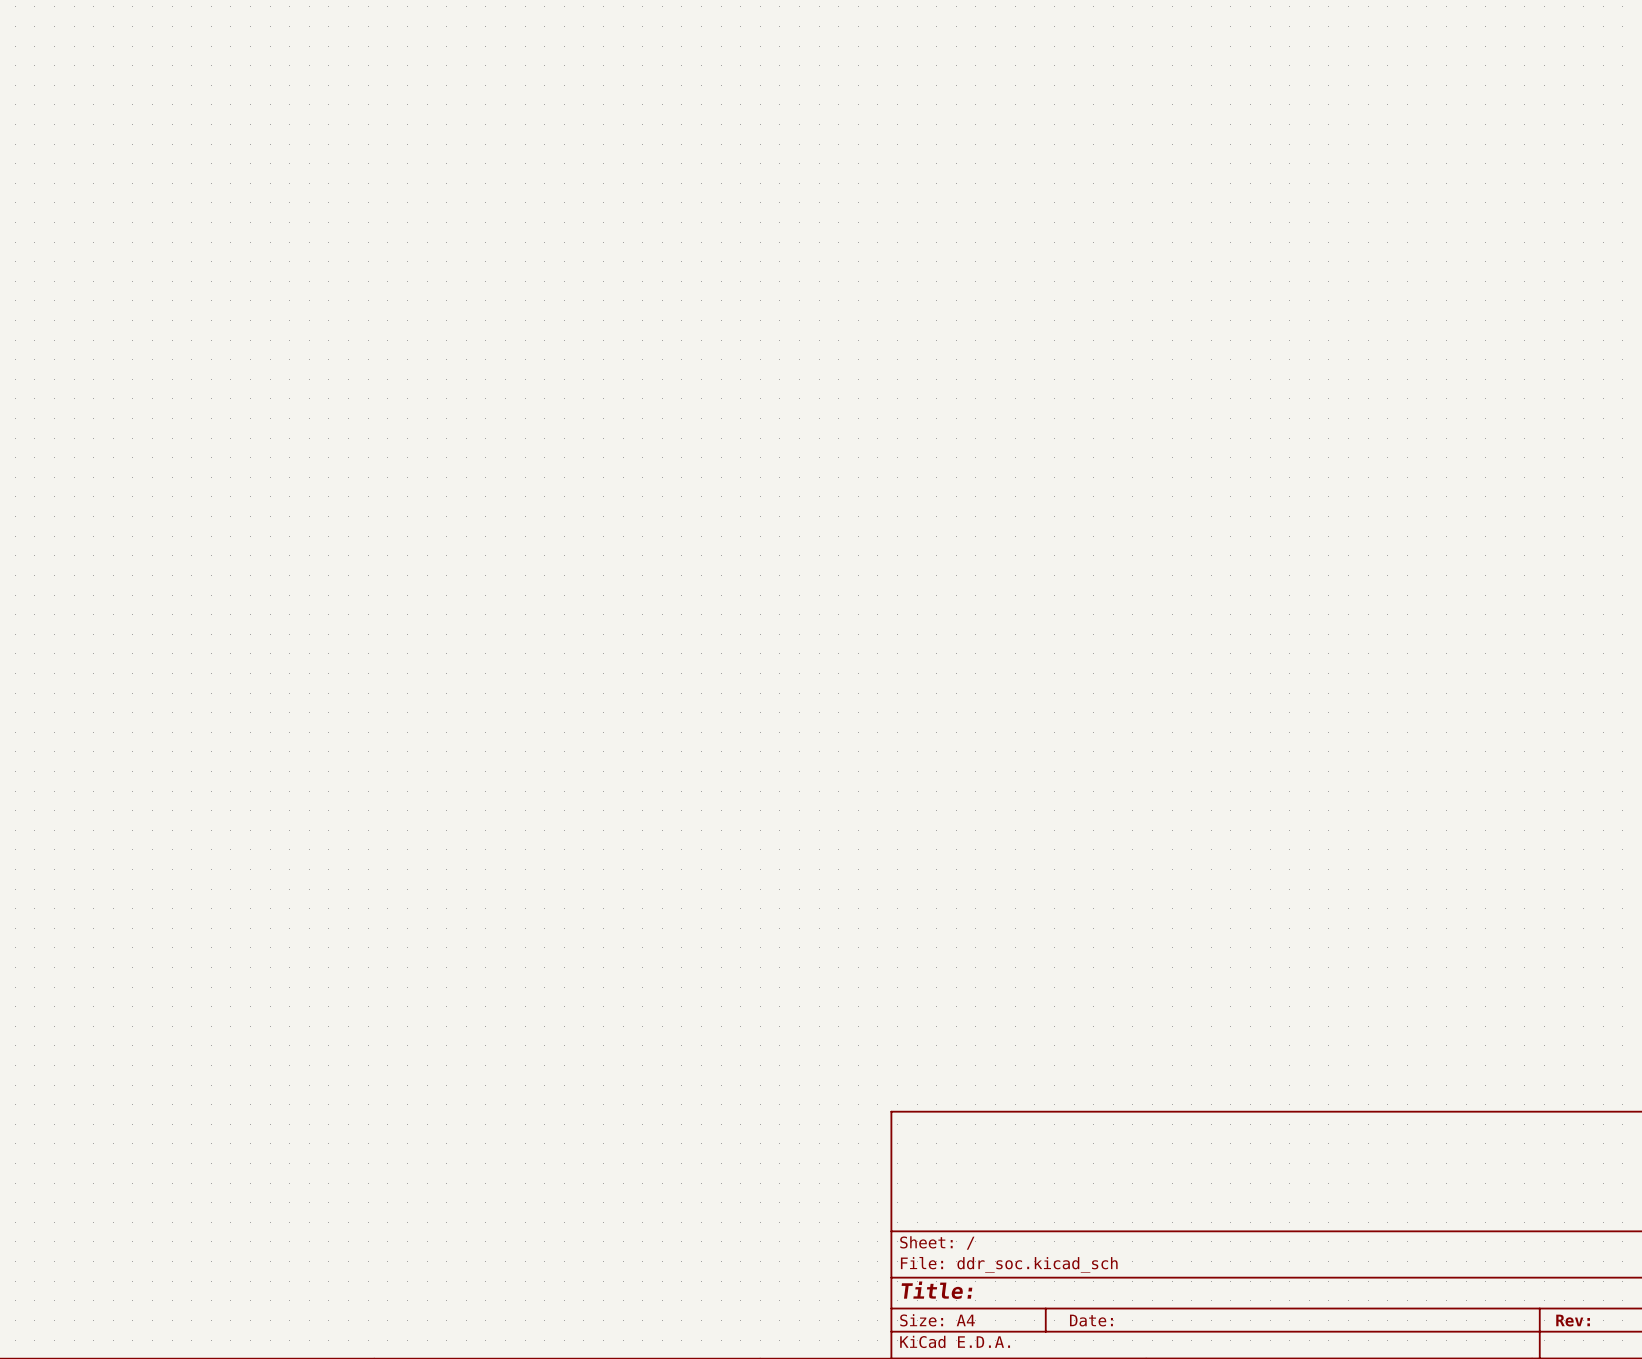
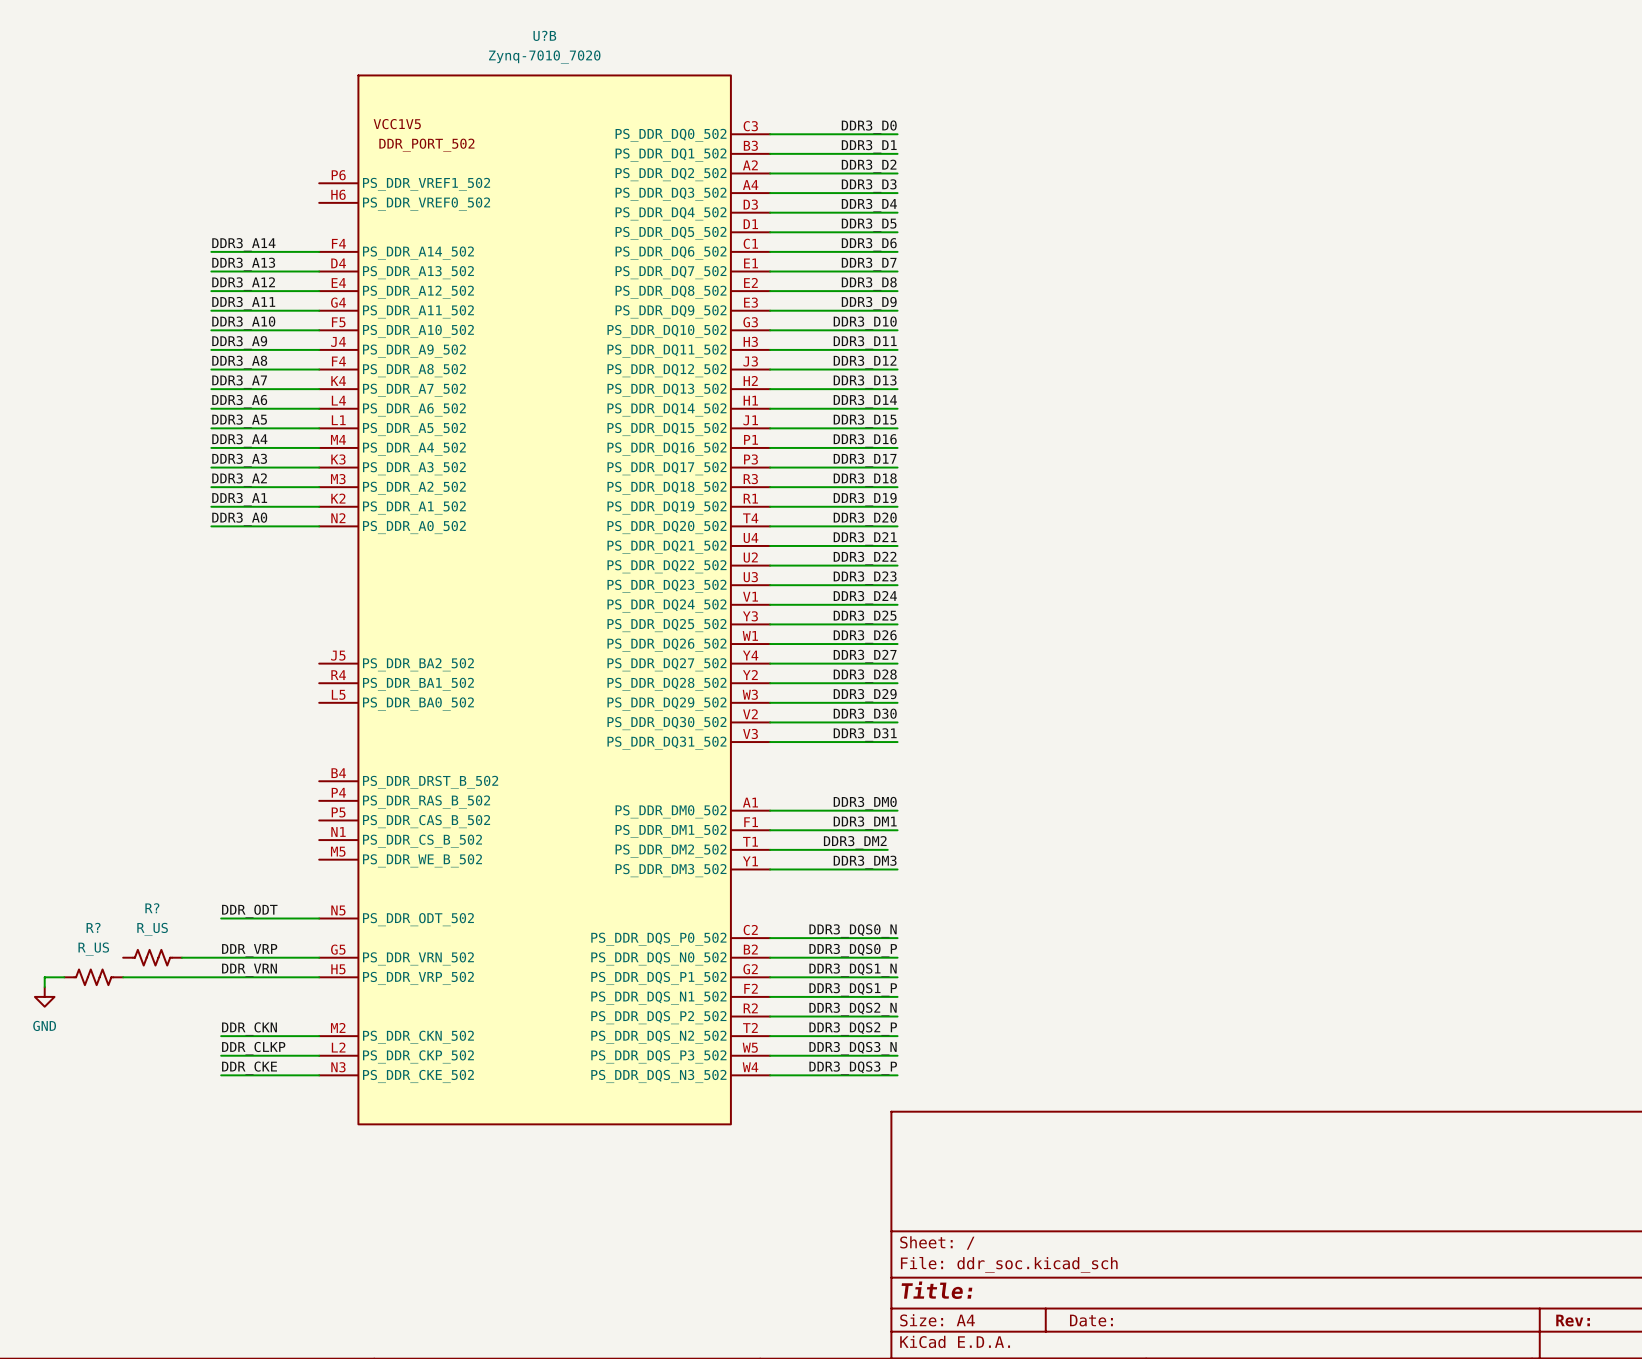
label: none -> DDR3_D0 (869, 127)
wire: none -> (770, 134) (897, 134)
label: none -> DDR3_D1 (869, 146)
wire: none -> (770, 153) (897, 153)
label: none -> DDR3_D2 (869, 166)
wire: none -> (770, 173) (897, 173)
label: none -> DDR3_D3 (869, 185)
wire: none -> (770, 193) (897, 193)
label: none -> DDR3_D4 (869, 205)
wire: none -> (770, 212) (897, 212)
label: none -> DDR3_D5 (869, 225)
wire: none -> (770, 232) (897, 232)
label: none -> DDR3_A14 (243, 244)
label: none -> DDR3_D6 (869, 244)
wire: none -> (211, 251) (319, 251)
wire: none -> (770, 251) (897, 251)
label: none -> DDR3_A13 (243, 264)
label: none -> DDR3_D7 (869, 264)
wire: none -> (211, 271) (319, 271)
wire: none -> (770, 271) (897, 271)
label: none -> DDR3_A12 (243, 283)
label: none -> DDR3_D8 (869, 283)
wire: none -> (211, 291) (319, 291)
wire: none -> (770, 291) (897, 291)
label: none -> DDR3_A11 (243, 303)
label: none -> DDR3_D9 (869, 303)
wire: none -> (211, 310) (319, 310)
wire: none -> (770, 310) (897, 310)
label: none -> DDR3_A10 (243, 323)
label: none -> DDR3_D10 (865, 323)
wire: none -> (211, 330) (319, 330)
wire: none -> (770, 330) (897, 330)
label: none -> DDR3_A9 (239, 342)
label: none -> DDR3_D11 (865, 342)
wire: none -> (211, 349) (319, 349)
wire: none -> (770, 349) (897, 349)
label: none -> DDR3_A8 (239, 362)
label: none -> DDR3_D12 (865, 362)
wire: none -> (211, 369) (319, 369)
wire: none -> (770, 369) (897, 369)
label: none -> DDR3_A7 (239, 381)
label: none -> DDR3_D13 (865, 381)
wire: none -> (211, 389) (319, 389)
wire: none -> (770, 389) (897, 389)
label: none -> DDR3_A6 (239, 401)
label: none -> DDR3_D14 (865, 401)
wire: none -> (211, 408) (319, 408)
wire: none -> (770, 408) (897, 408)
label: none -> DDR3_A5 (239, 421)
label: none -> DDR3_D15 (865, 421)
wire: none -> (211, 428) (319, 428)
wire: none -> (770, 428) (897, 428)
label: none -> DDR3_A4 (239, 440)
label: none -> DDR3_D16 (865, 440)
wire: none -> (211, 447) (319, 447)
wire: none -> (770, 447) (897, 447)
label: none -> DDR3_A3 (239, 460)
label: none -> DDR3_D17 (865, 460)
wire: none -> (211, 467) (319, 467)
wire: none -> (770, 467) (897, 467)
label: none -> DDR3_A2 (239, 479)
label: none -> DDR3_D18 (865, 479)
wire: none -> (211, 487) (319, 487)
wire: none -> (770, 487) (897, 487)
label: none -> DDR3_A1 (239, 499)
label: none -> DDR3_D19 (865, 499)
wire: none -> (211, 506) (319, 506)
wire: none -> (770, 506) (897, 506)
label: none -> DDR3_A0 (239, 519)
label: none -> DDR3_D20 (865, 519)
wire: none -> (211, 526) (319, 526)
wire: none -> (770, 526) (897, 526)
label: none -> DDR3_D21 (865, 538)
wire: none -> (770, 545) (897, 545)
label: none -> DDR3_D22 (865, 558)
wire: none -> (770, 565) (897, 565)
label: none -> DDR3_D23 (865, 577)
wire: none -> (770, 585) (897, 585)
label: none -> DDR3_D24 (865, 597)
U?B: none -> Zynq-7010_7020 (544, 599)
wire: none -> (770, 604) (897, 604)
label: none -> DDR3_D25 (865, 617)
wire: none -> (770, 624) (897, 624)
label: none -> DDR3_D26 (865, 636)
wire: none -> (770, 644) (897, 644)
label: none -> DDR3_D27 (865, 656)
wire: none -> (770, 663) (897, 663)
label: none -> DDR3_D28 (865, 675)
wire: none -> (770, 683) (897, 683)
label: none -> DDR3_D29 (865, 695)
wire: none -> (770, 702) (897, 702)
label: none -> DDR3_D30 (865, 715)
wire: none -> (770, 722) (897, 722)
label: none -> DDR3_D31 (865, 734)
wire: none -> (770, 742) (897, 742)
label: none -> DDR3_DM0 (865, 803)
wire: none -> (770, 810) (897, 810)
label: none -> DDR3_DM1 (865, 823)
wire: none -> (770, 830) (897, 830)
label: none -> DDR3_DM2 (855, 842)
wire: none -> (770, 849) (887, 849)
label: none -> DDR3_DM3 (865, 862)
wire: none -> (770, 869) (897, 869)
label: none -> DDR_ODT (249, 911)
wire: none -> (221, 918) (319, 918)
label: none -> DDR3_DQS0_N (853, 930)
wire: none -> (770, 938) (897, 938)
label: none -> DDR_VRP (249, 950)
label: none -> DDR3_DQS0_P (853, 950)
R?: none -> R_US (152, 957)
wire: none -> (181, 957) (319, 957)
wire: none -> (770, 957) (897, 957)
label: none -> DDR_VRN (249, 970)
label: none -> DDR3_DQS1_N (853, 970)
wire: none -> (64, 977) (44, 977) (44, 987)
R?: none -> R_US (93, 977)
wire: none -> (123, 977) (319, 977)
wire: none -> (770, 977) (897, 977)
label: none -> DDR3_DQS1_P (853, 989)
power symbol: none -> GND (44, 996)
wire: none -> (770, 996) (897, 996)
label: none -> DDR3_DQS2_N (853, 1009)
wire: none -> (770, 1016) (897, 1016)
label: none -> DDR_CKN (249, 1028)
label: none -> DDR3_DQS2_P (853, 1028)
wire: none -> (221, 1036) (319, 1036)
wire: none -> (770, 1036) (897, 1036)
label: none -> DDR_CLKP (253, 1048)
label: none -> DDR3_DQS3_N (853, 1048)
wire: none -> (221, 1055) (319, 1055)
wire: none -> (770, 1055) (897, 1055)
label: none -> DDR_CKE (249, 1068)
label: none -> DDR3_DQS3_P (853, 1068)
wire: none -> (221, 1075) (319, 1075)
wire: none -> (770, 1075) (897, 1075)

